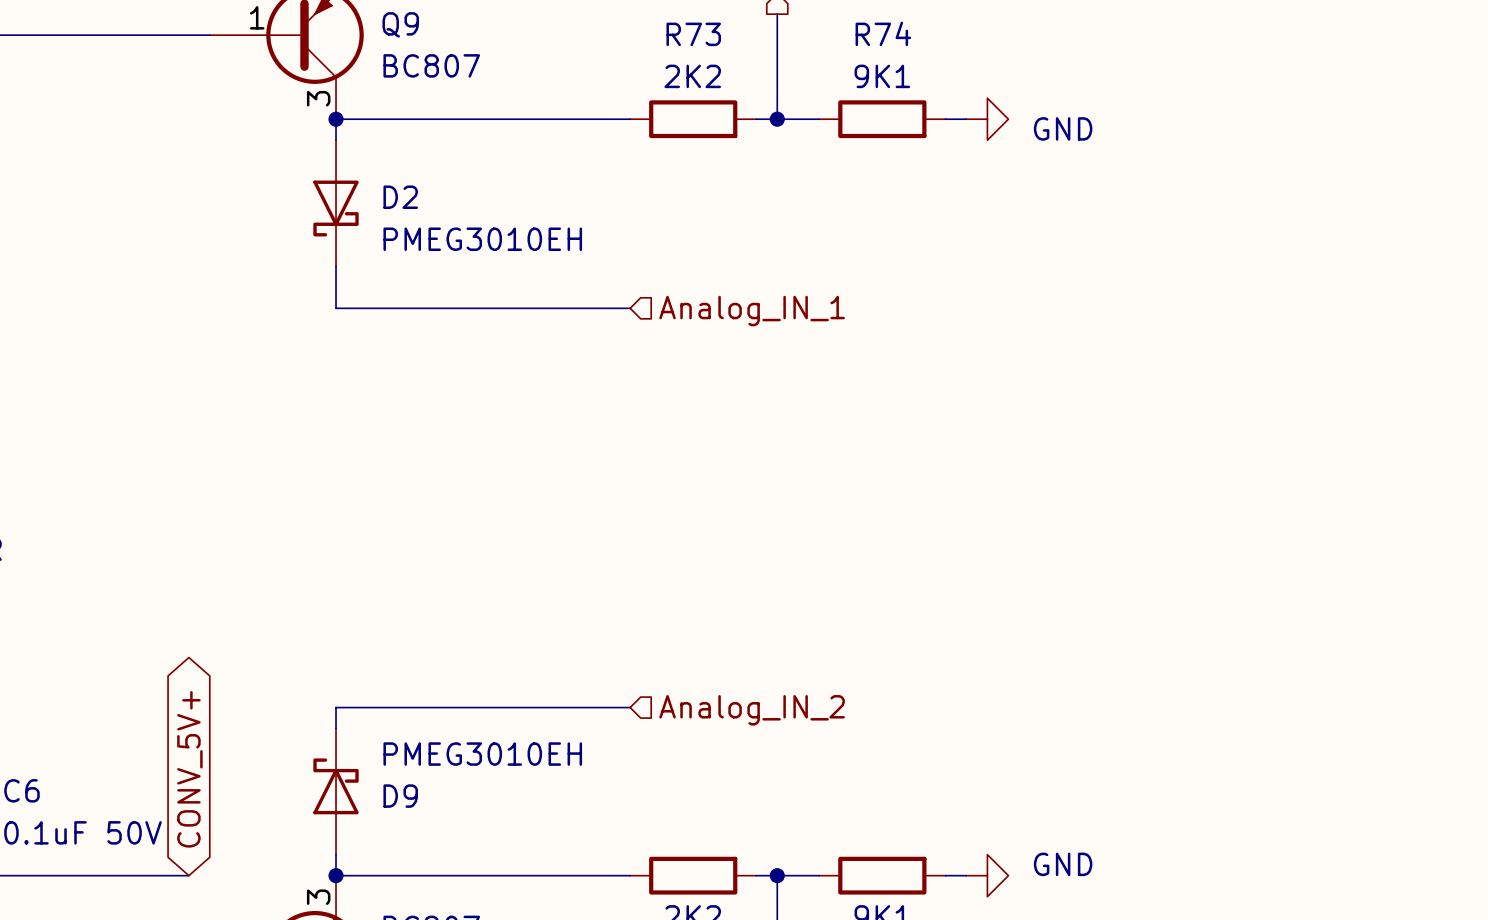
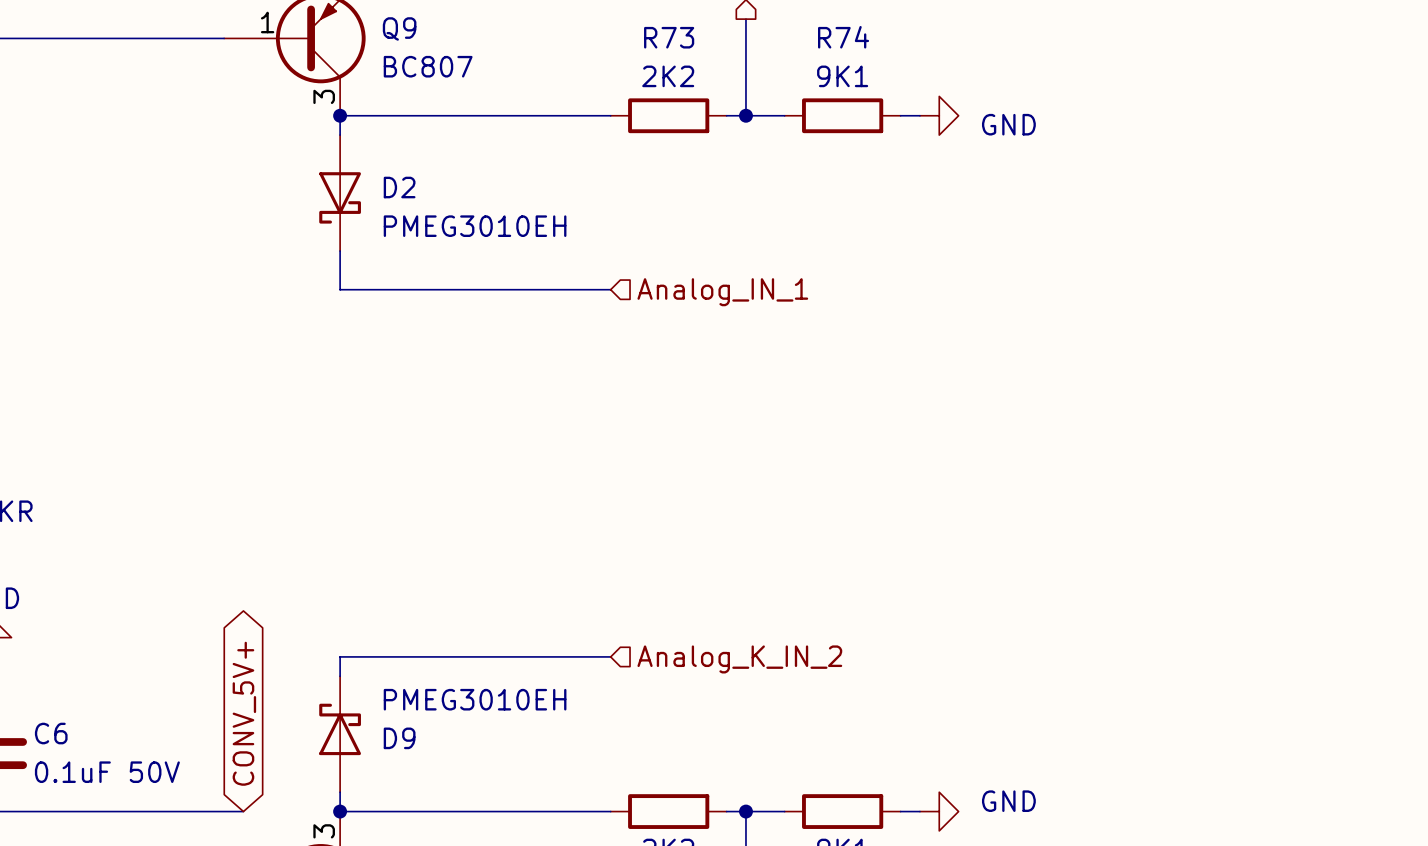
hierarchical label: Analog_IN_2 (752, 710) -> Analog_K_IN_2 (739, 659)
global label position: CONV_5V+ (189, 769) -> CONV_5V+ (244, 713)
wire: none -> (204, 811) (243, 811)

